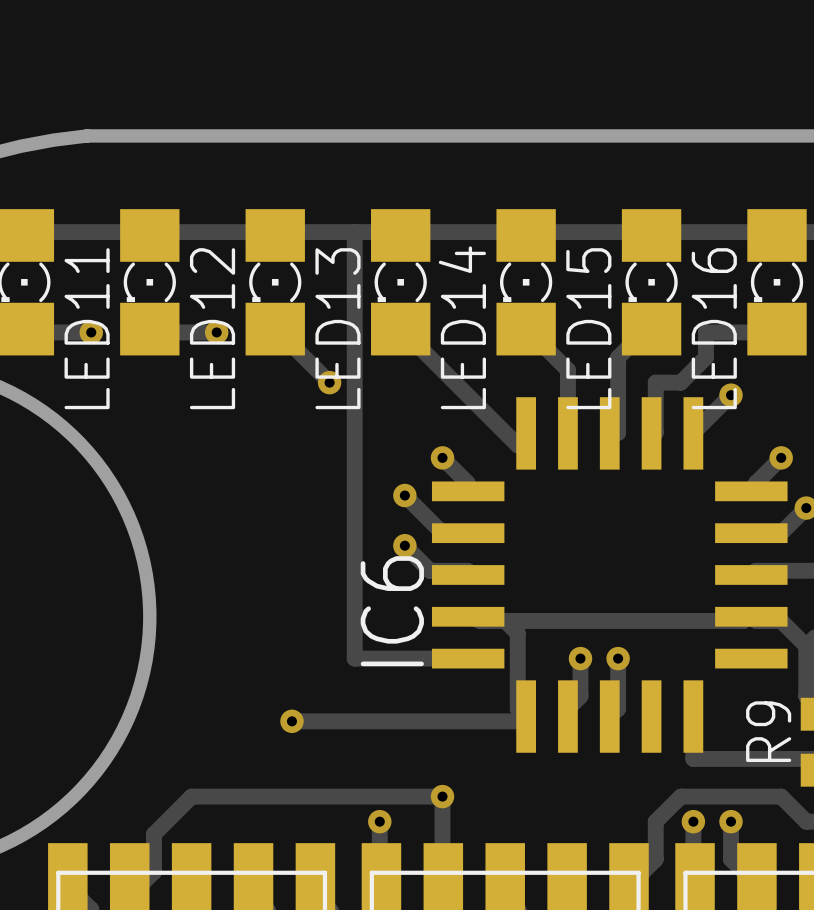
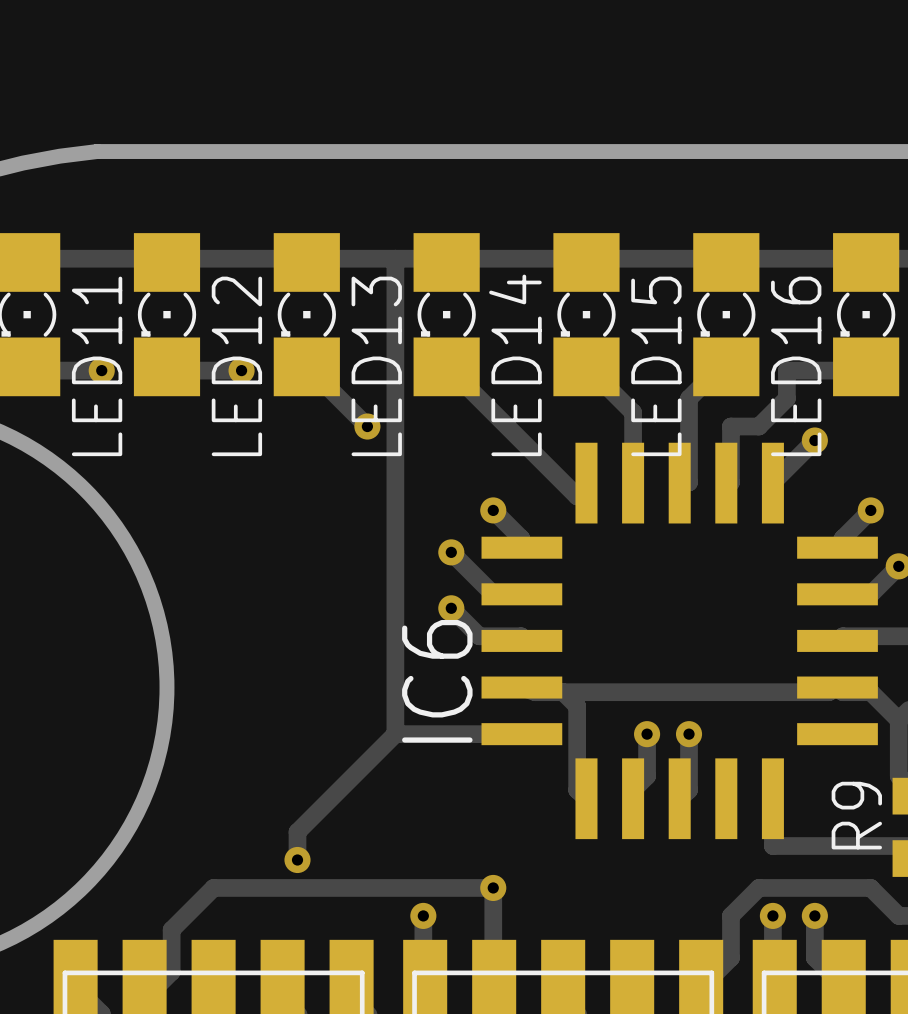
track: none -> (395, 734) (297, 832) (297, 859)
track: (526, 716) (517, 721) (291, 721) -> none
via position: (291, 721) -> (297, 859)

